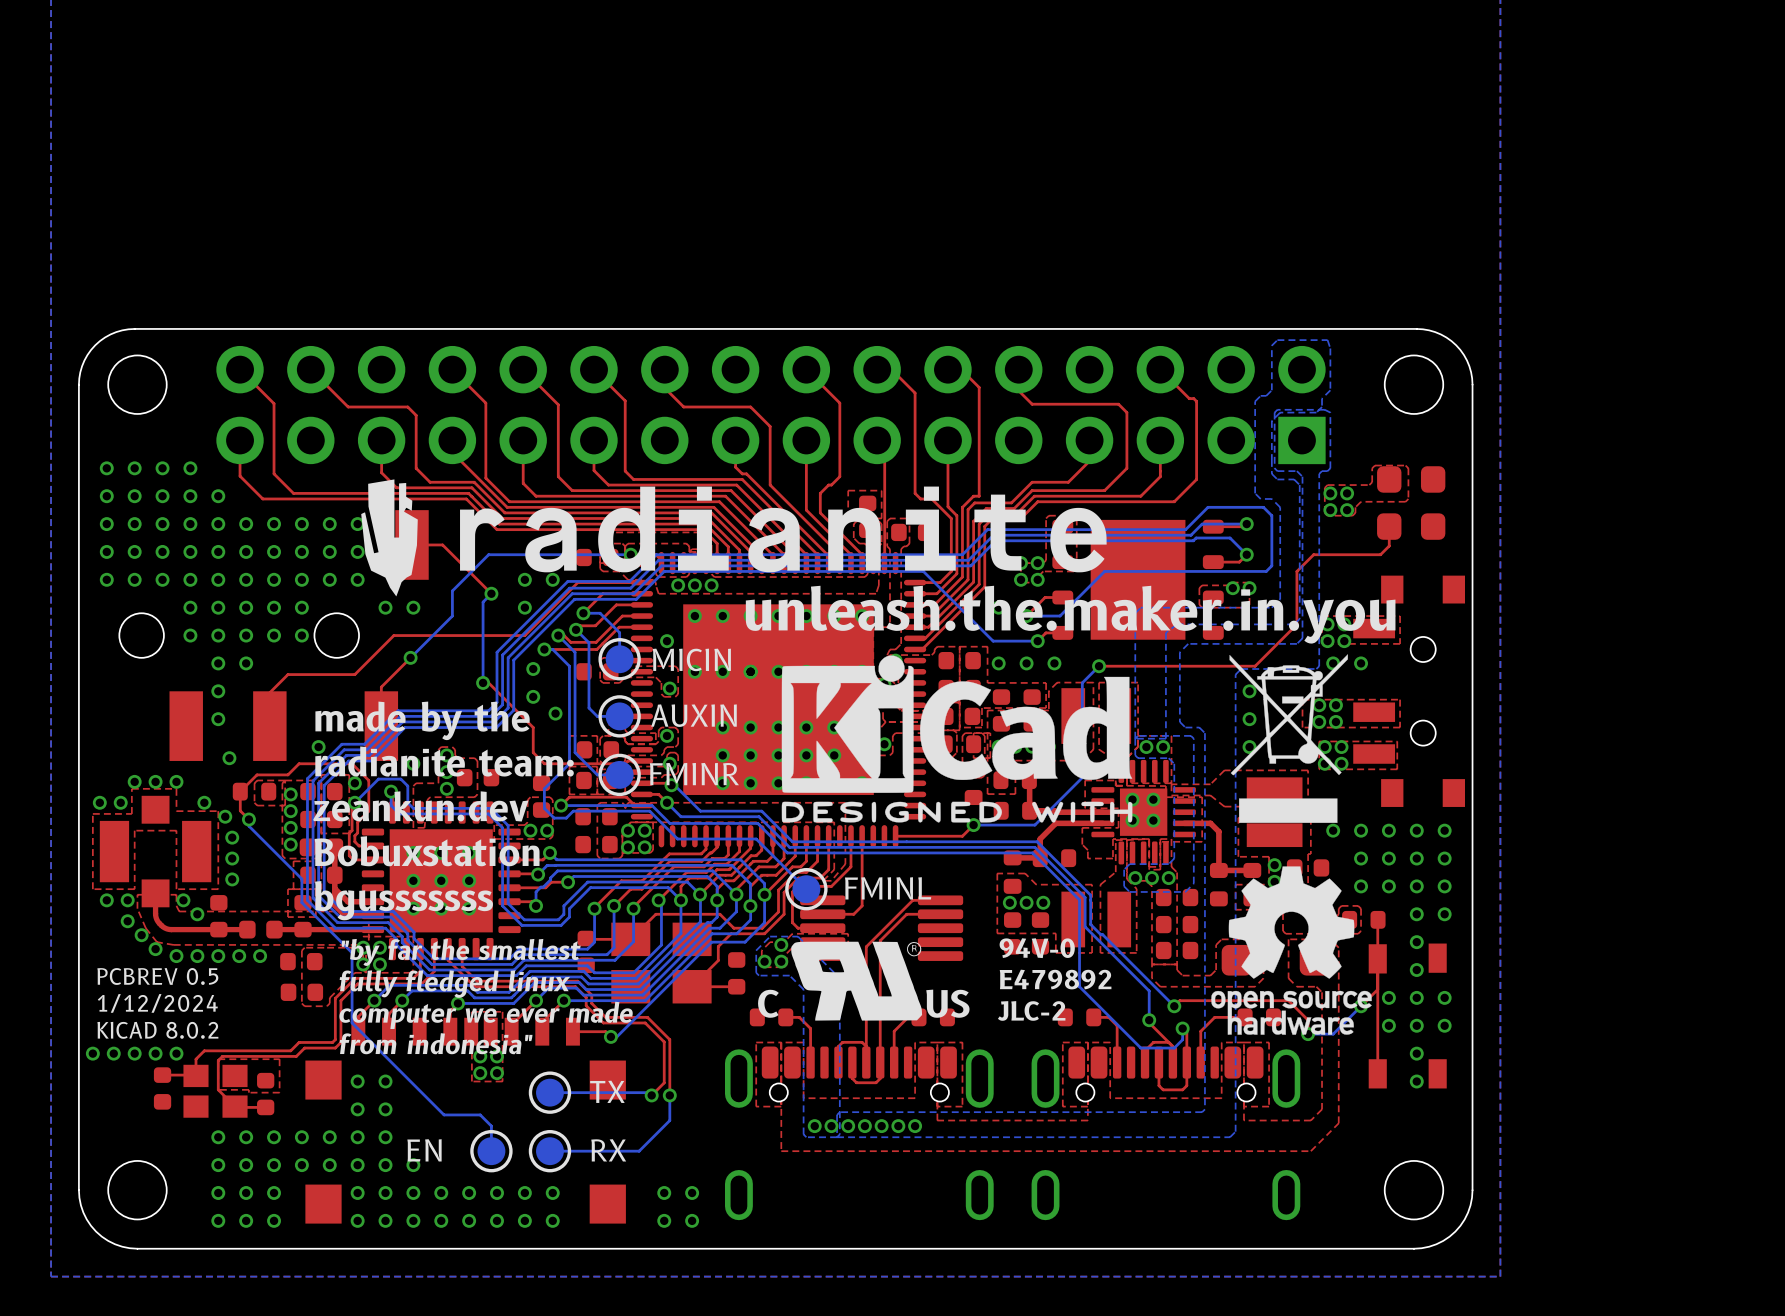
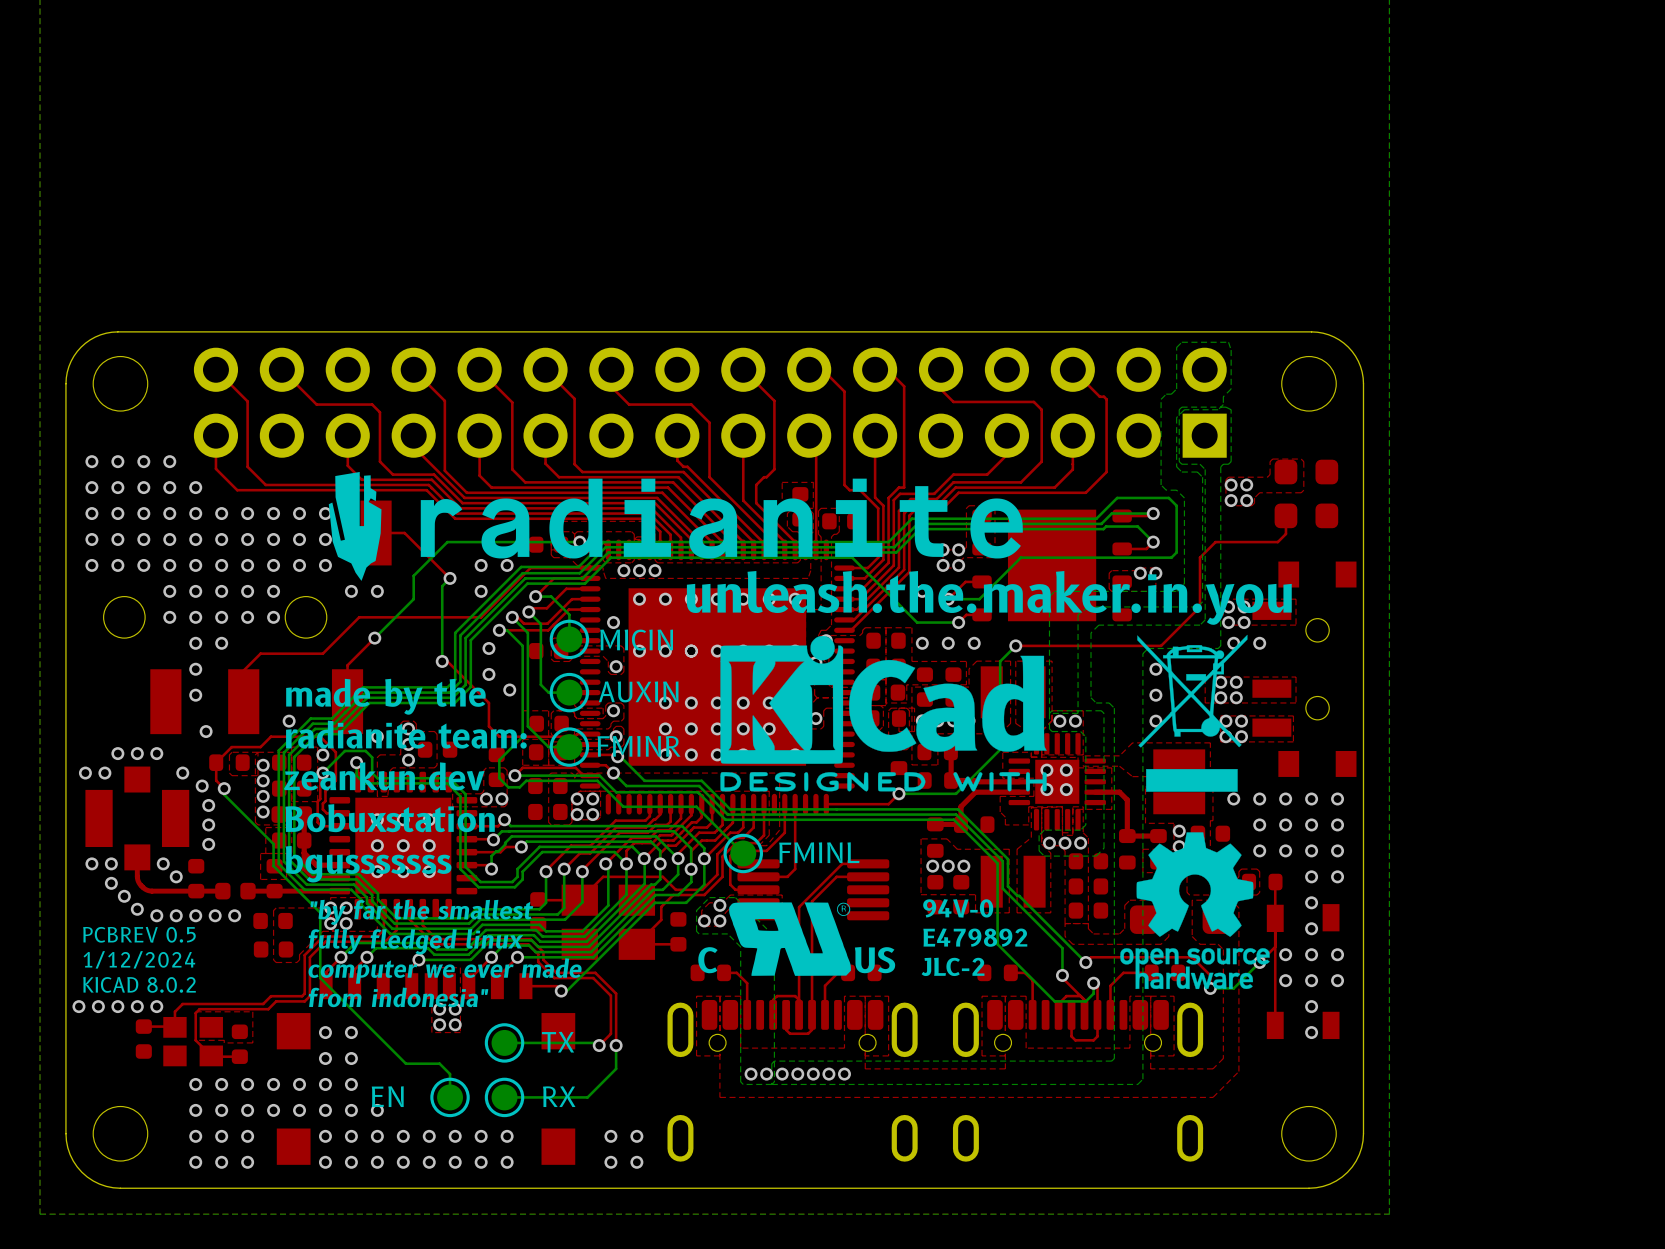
top zone outline: (176, 788) (176, 811) (218, 811) (218, 889) (176, 889) (176, 830) (134, 830) (134, 889) (92, 889) (92, 813) (131, 813) (131, 788) (176, 788) -> none
top zone outline: (176, 894) (176, 905) (179, 911) (368, 911) (368, 944) (173, 944) (156, 942) (145, 928) (137, 908) (137, 894) (176, 894) -> none

